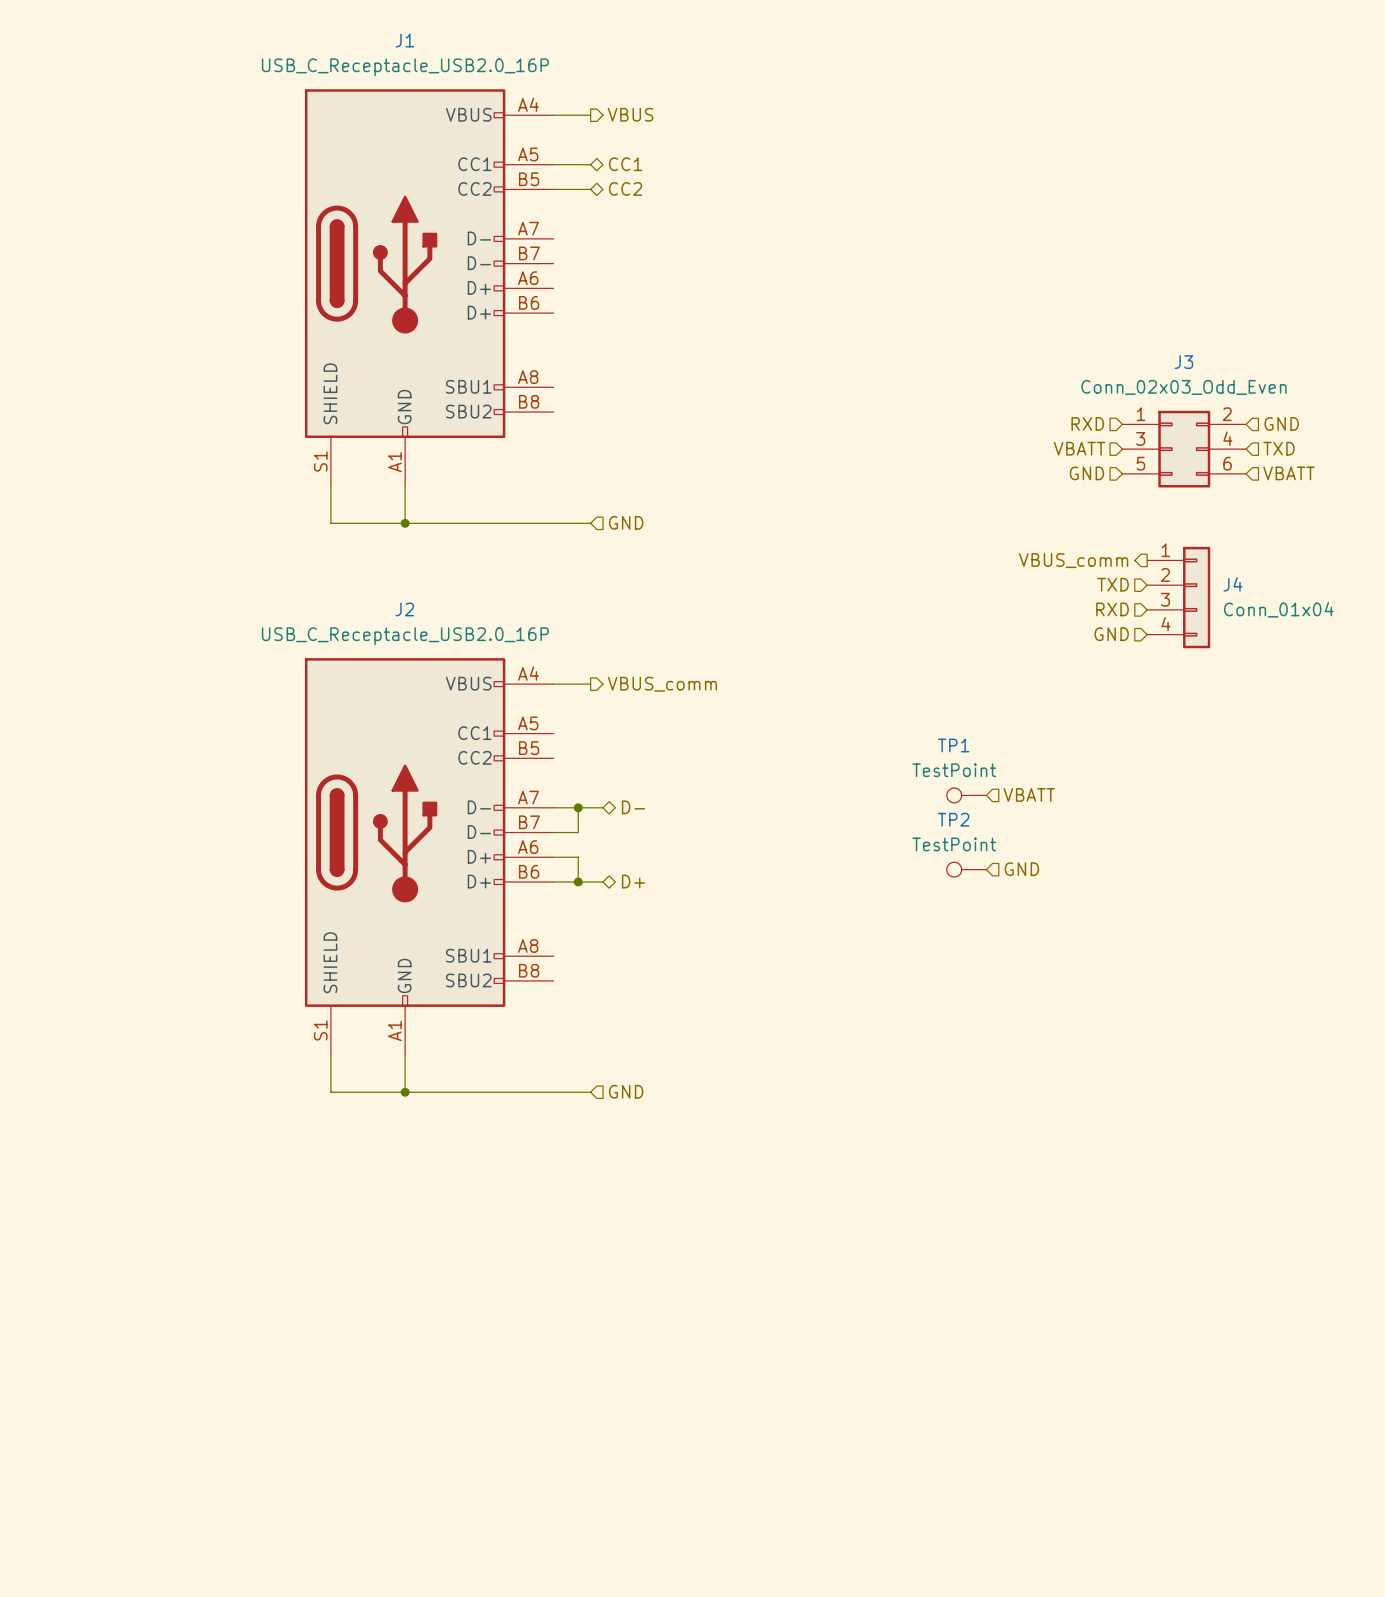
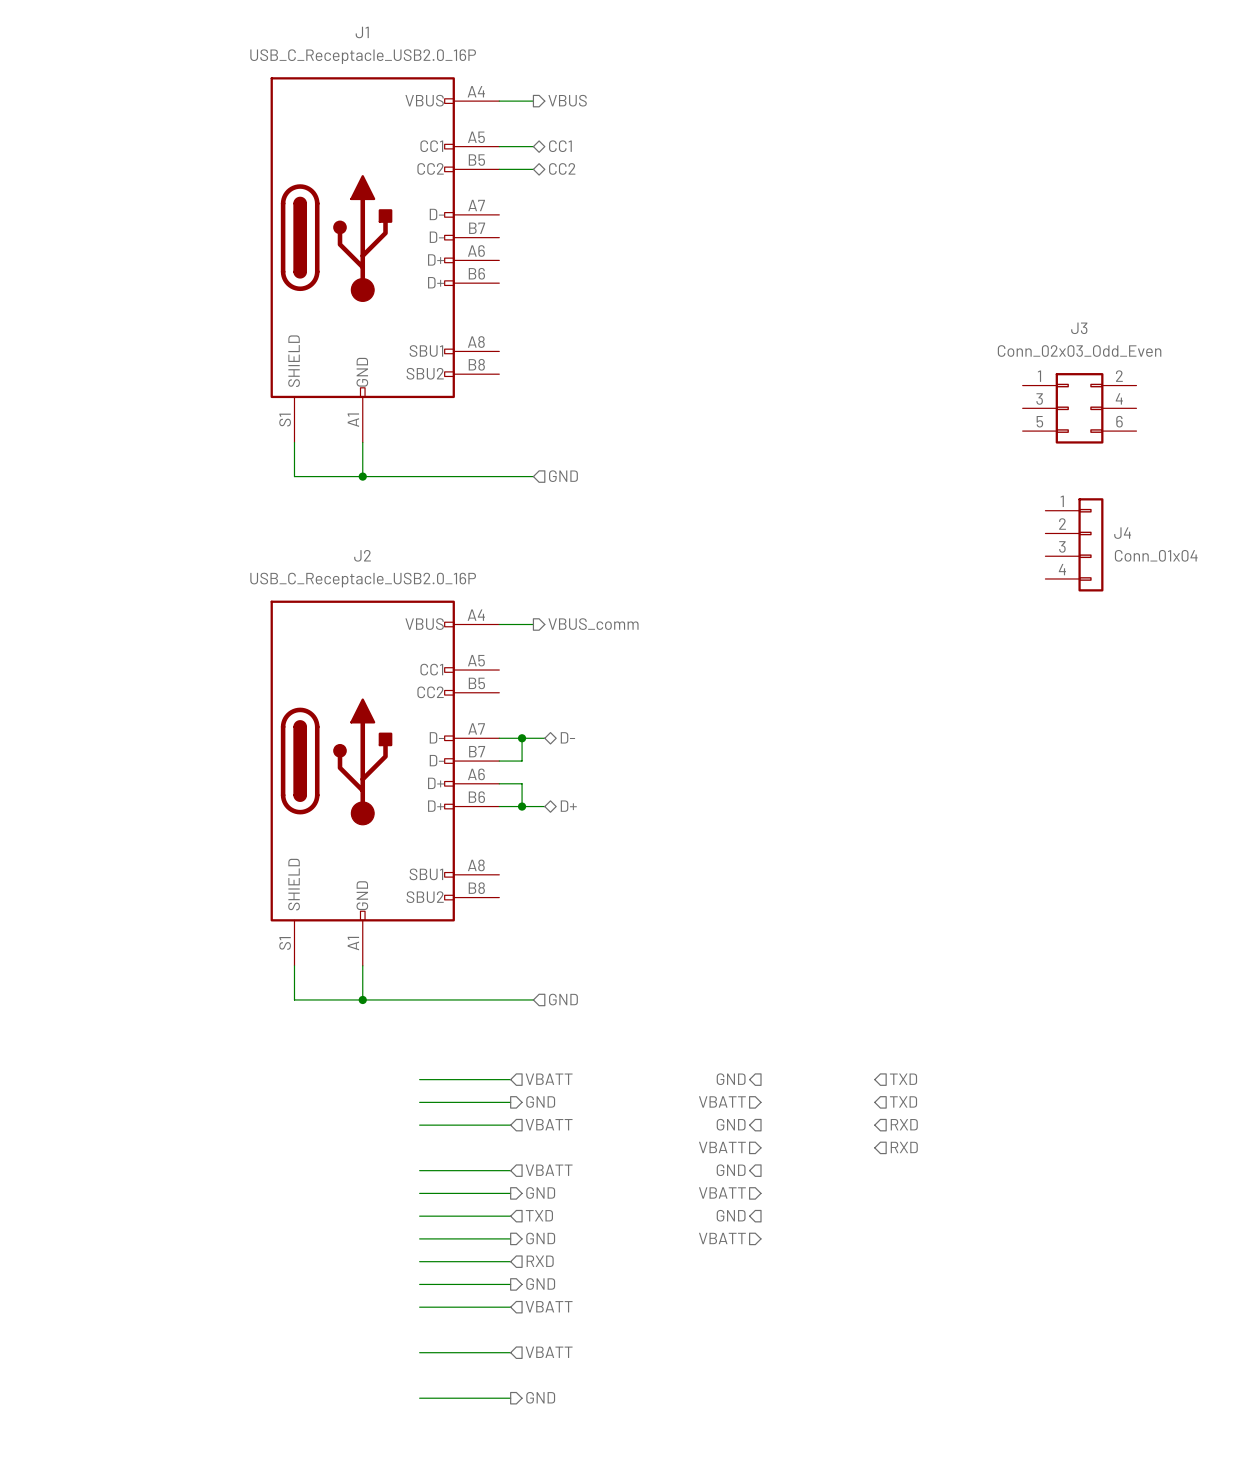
hierarchical label: RXD (1087, 423) -> none
hierarchical label: GND (1281, 423) -> none
hierarchical label: VBATT (1079, 448) -> none
hierarchical label: TXD (1278, 448) -> none
hierarchical label: GND (1086, 473) -> none
hierarchical label: VBATT (1288, 473) -> none
hierarchical label: VBUS_comm (1073, 560) -> none
hierarchical label: TXD (1113, 584) -> none
hierarchical label: RXD (1112, 609) -> none
hierarchical label: GND (1111, 634) -> none
hierarchical label: VBATT (1029, 794) -> none
TP1: TestPoint (966, 795) -> none
TP2: TestPoint (966, 869) -> none
hierarchical label: GND (1021, 869) -> none
wire: none -> (419, 1079) (510, 1079)
hierarchical label: none -> VBATT (549, 1079)
hierarchical label: none -> GND (731, 1079)
hierarchical label: none -> TXD (903, 1079)
wire: none -> (419, 1102) (510, 1102)
hierarchical label: none -> GND (540, 1101)
hierarchical label: none -> VBATT (722, 1101)
hierarchical label: none -> TXD (903, 1101)
hierarchical label: none -> VBATT (549, 1124)
hierarchical label: none -> GND (731, 1124)
hierarchical label: none -> RXD (904, 1124)
wire: none -> (419, 1125) (510, 1125)
hierarchical label: none -> VBATT (722, 1147)
hierarchical label: none -> RXD (904, 1147)
wire: none -> (419, 1170) (510, 1170)
hierarchical label: none -> VBATT (549, 1170)
hierarchical label: none -> GND (731, 1170)
wire: none -> (419, 1193) (510, 1193)
hierarchical label: none -> GND (540, 1192)
hierarchical label: none -> VBATT (722, 1192)
hierarchical label: none -> TXD (539, 1215)
hierarchical label: none -> GND (731, 1215)
wire: none -> (419, 1216) (510, 1216)
wire: none -> (419, 1238) (510, 1238)
hierarchical label: none -> GND (540, 1238)
hierarchical label: none -> VBATT (722, 1238)
wire: none -> (419, 1261) (510, 1261)
hierarchical label: none -> RXD (540, 1261)
hierarchical label: none -> GND (540, 1284)
wire: none -> (419, 1284) (510, 1284)
hierarchical label: none -> VBATT (549, 1306)
wire: none -> (419, 1307) (510, 1307)
wire: none -> (419, 1352) (510, 1352)
hierarchical label: none -> VBATT (549, 1352)
hierarchical label: none -> GND (540, 1397)
wire: none -> (419, 1398) (510, 1398)

